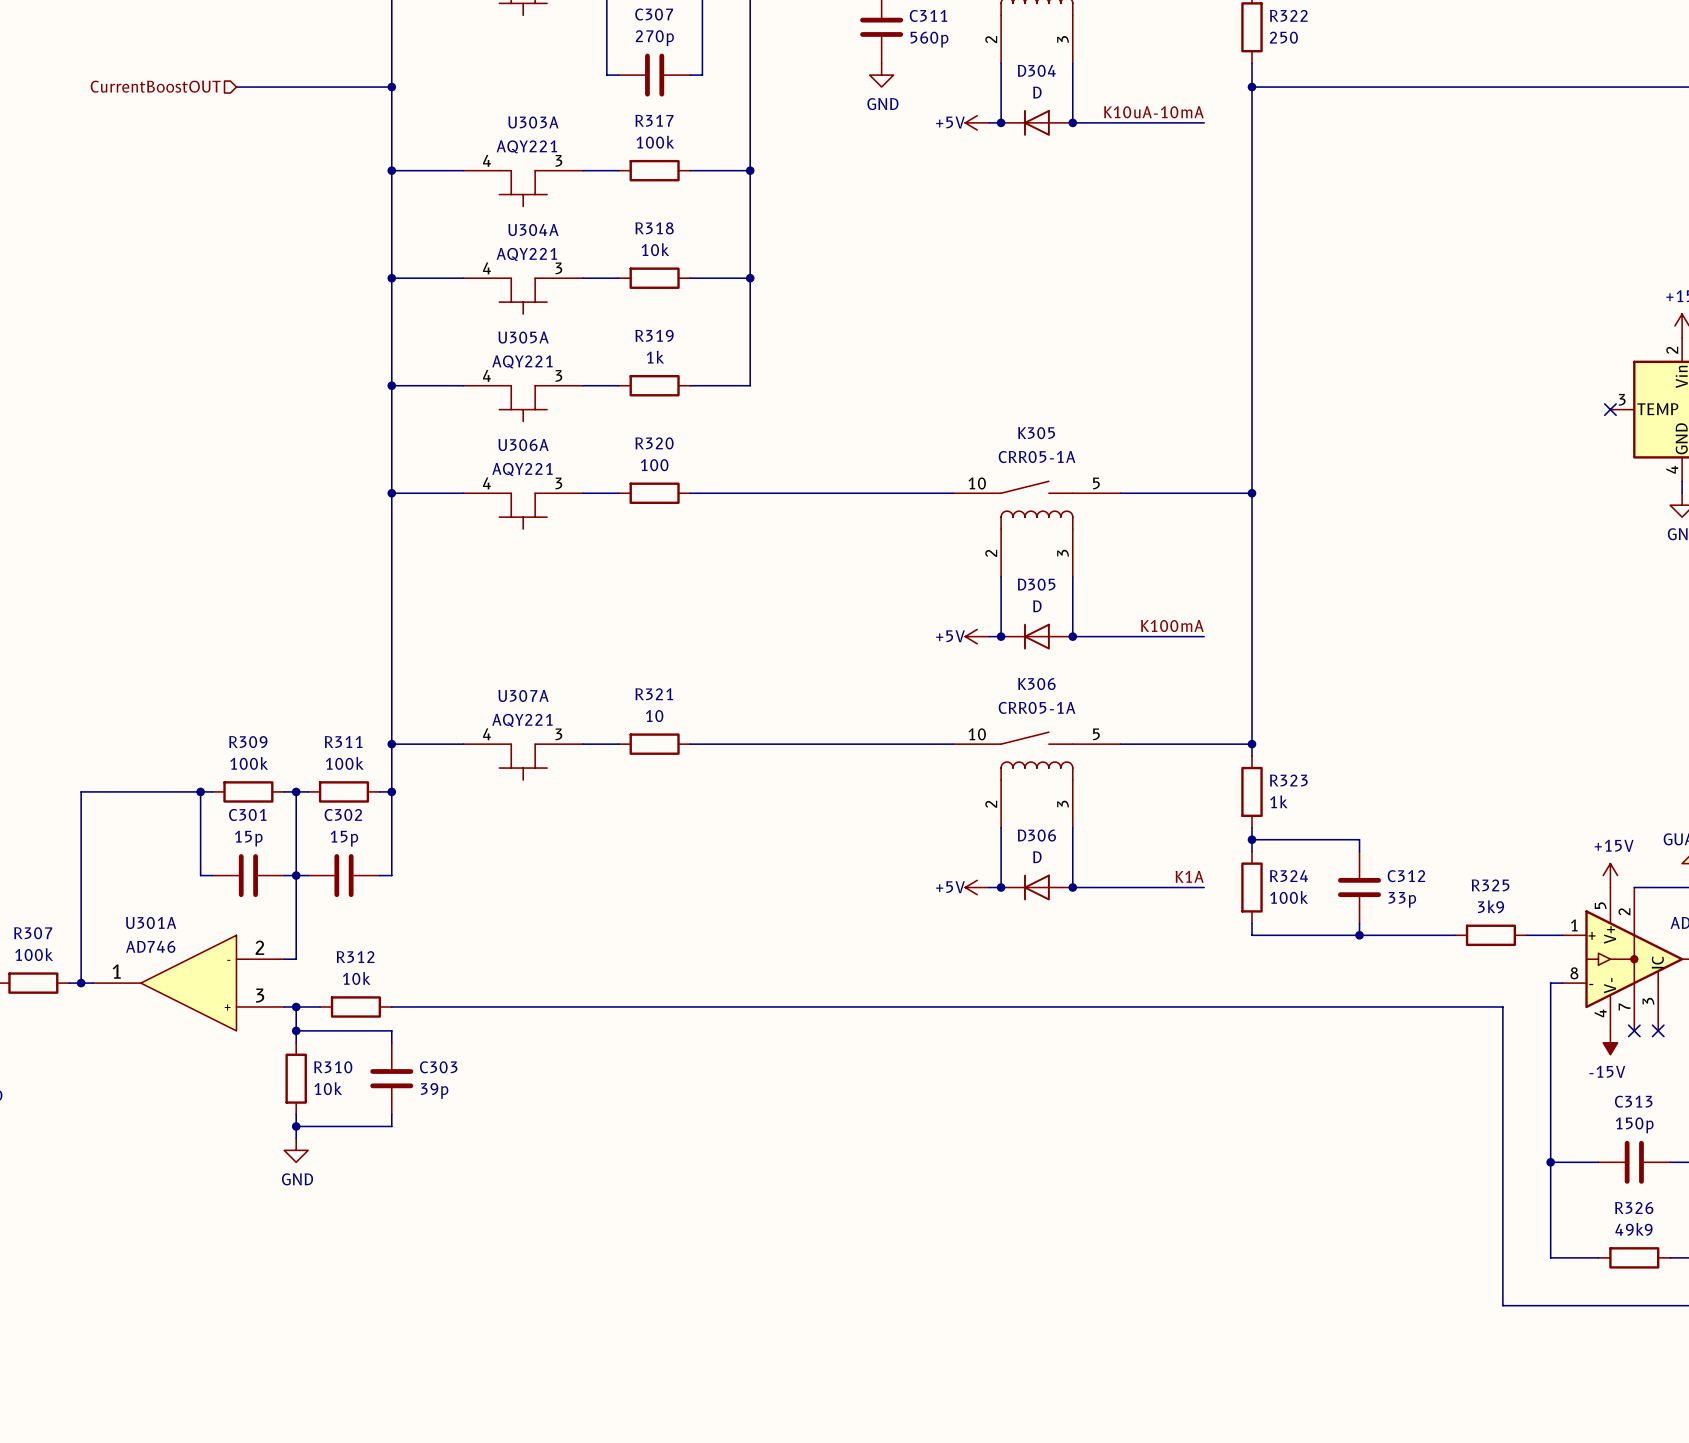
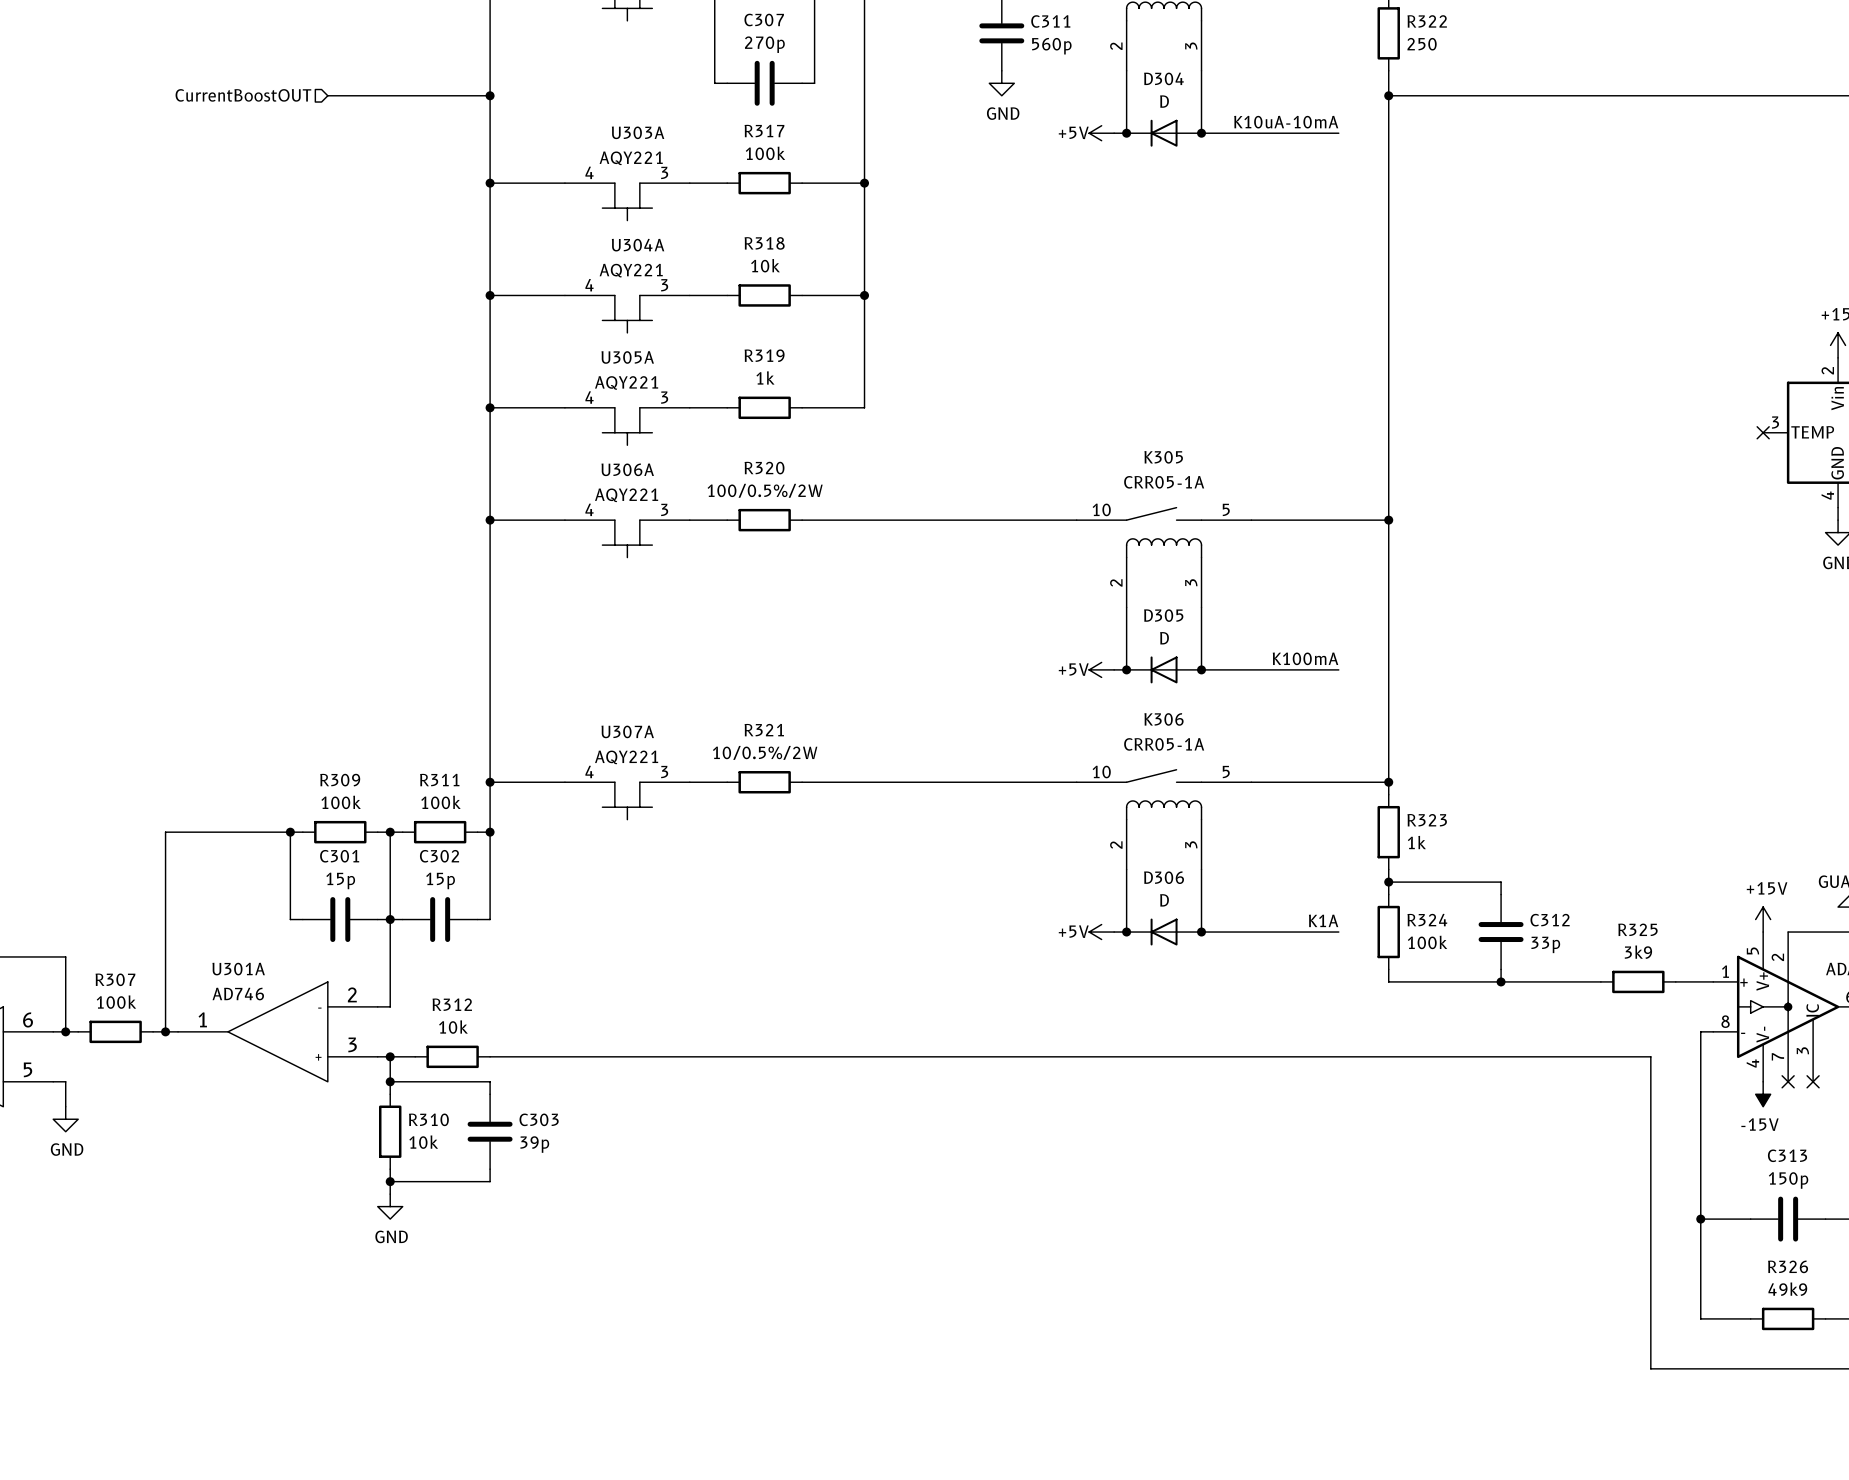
R320 value: 100 (654, 465) -> 100/0.5%/2W (765, 490)
R321 value: 10 (654, 716) -> 10/0.5%/2W (765, 752)

